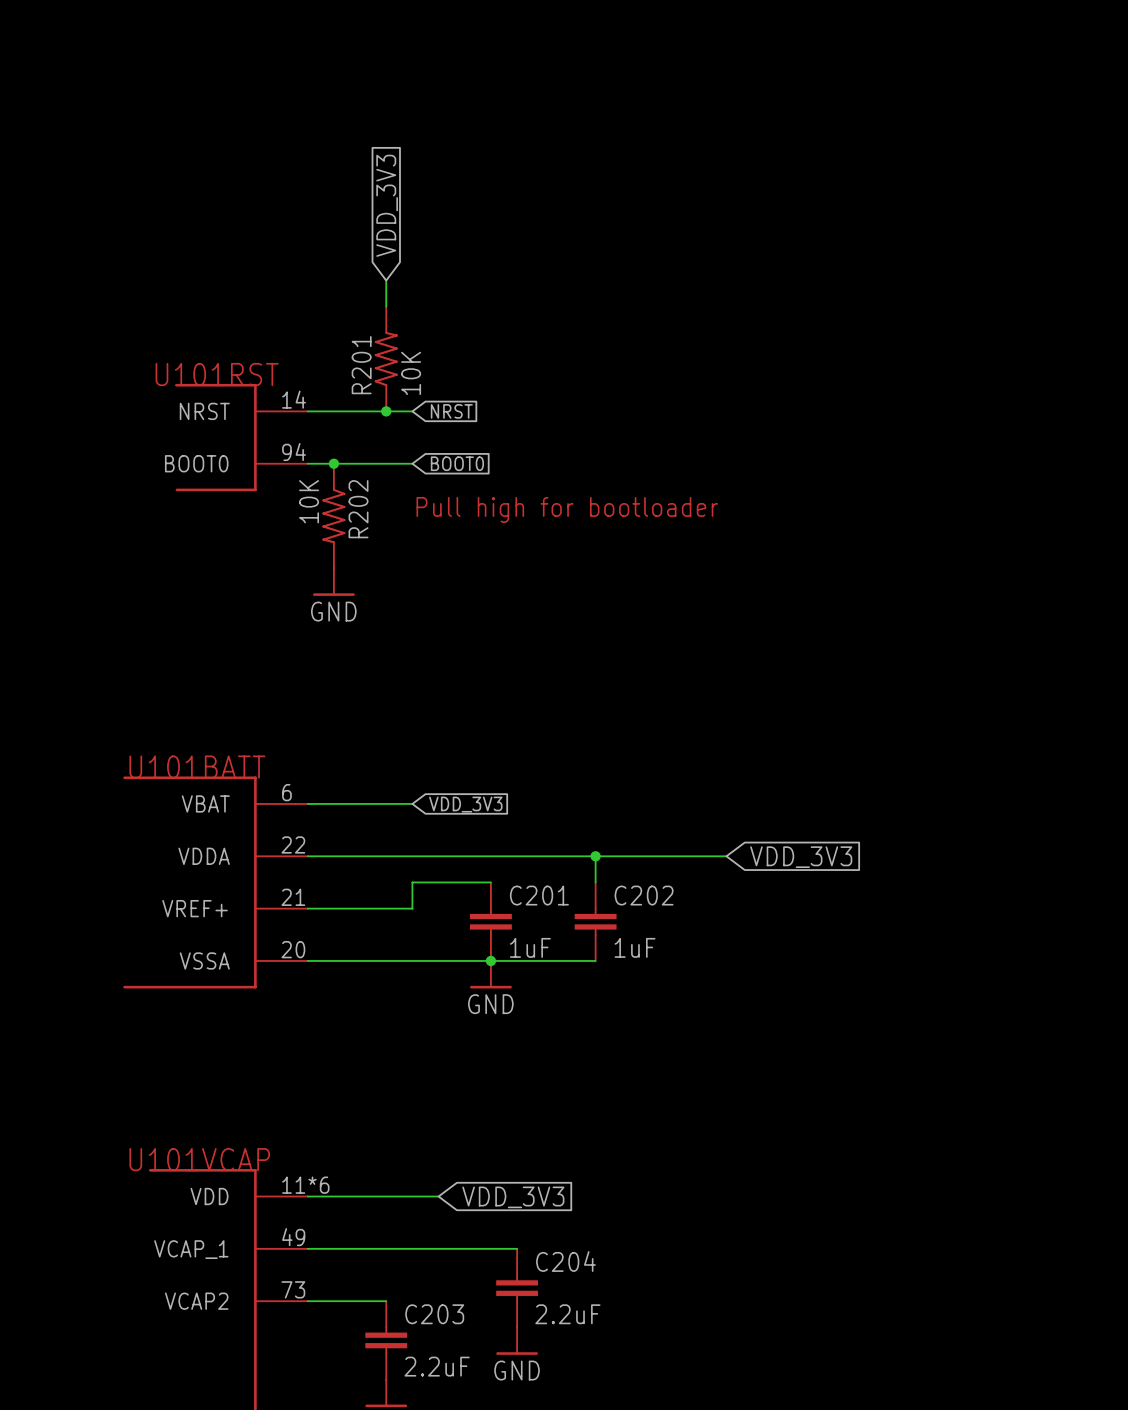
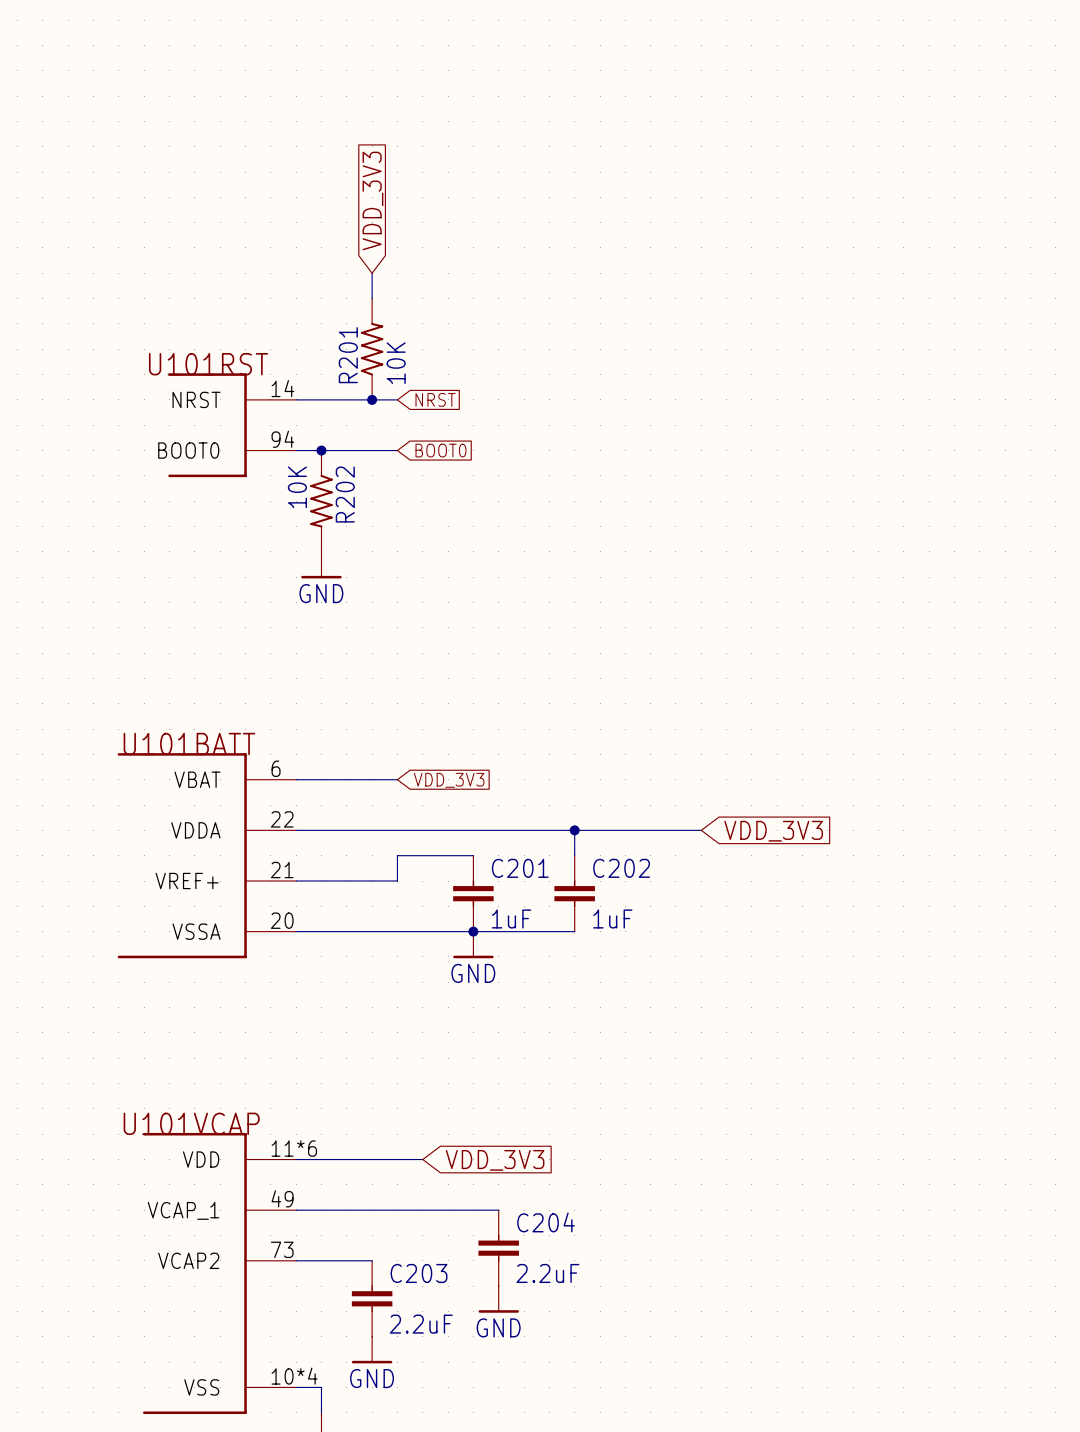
text: Pull high for bootloader (567, 509) -> none

